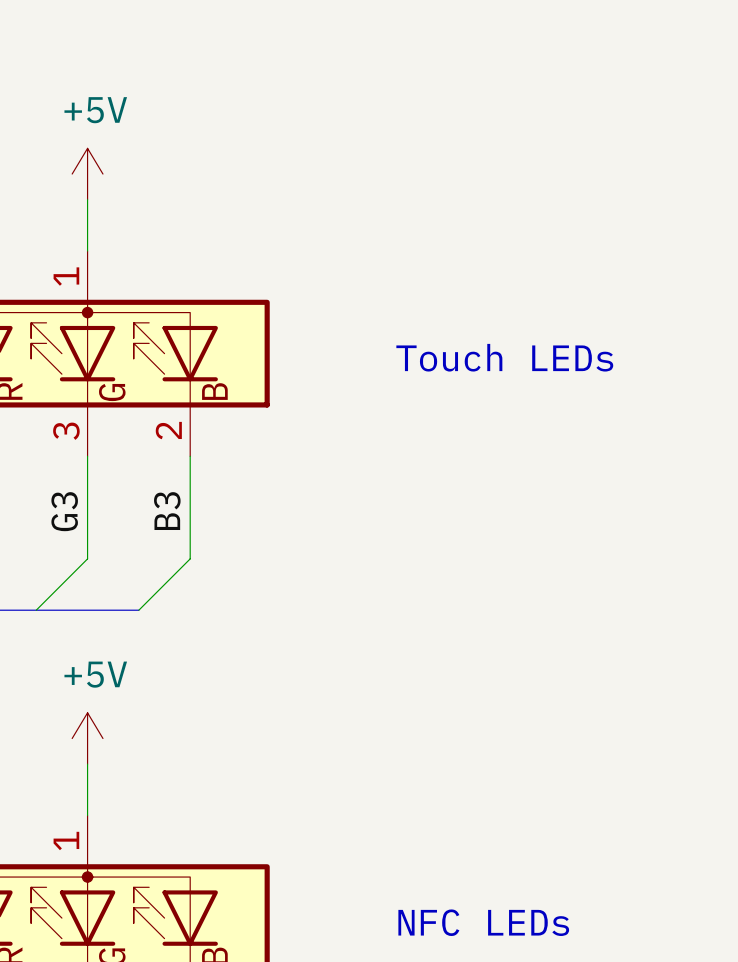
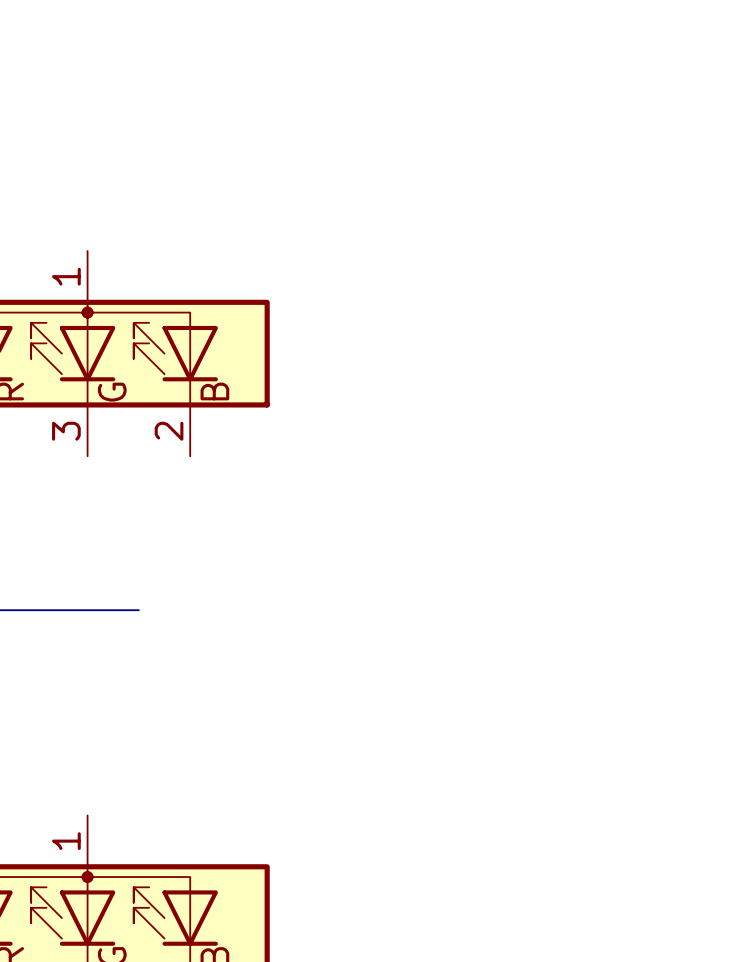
power symbol: +5V (87, 174) -> none
wire: (87, 199) (87, 251) -> none
text: Touch LEDs (504, 357) -> none
wire: (87, 456) (87, 558) (36, 610) -> none
wire: (190, 456) (190, 558) (138, 610) -> none
label: G3 (64, 511) -> none
label: B3 (167, 511) -> none
power symbol: +5V (87, 738) -> none
wire: (87, 764) (87, 815) -> none
text: NFC LEDs (483, 922) -> none

